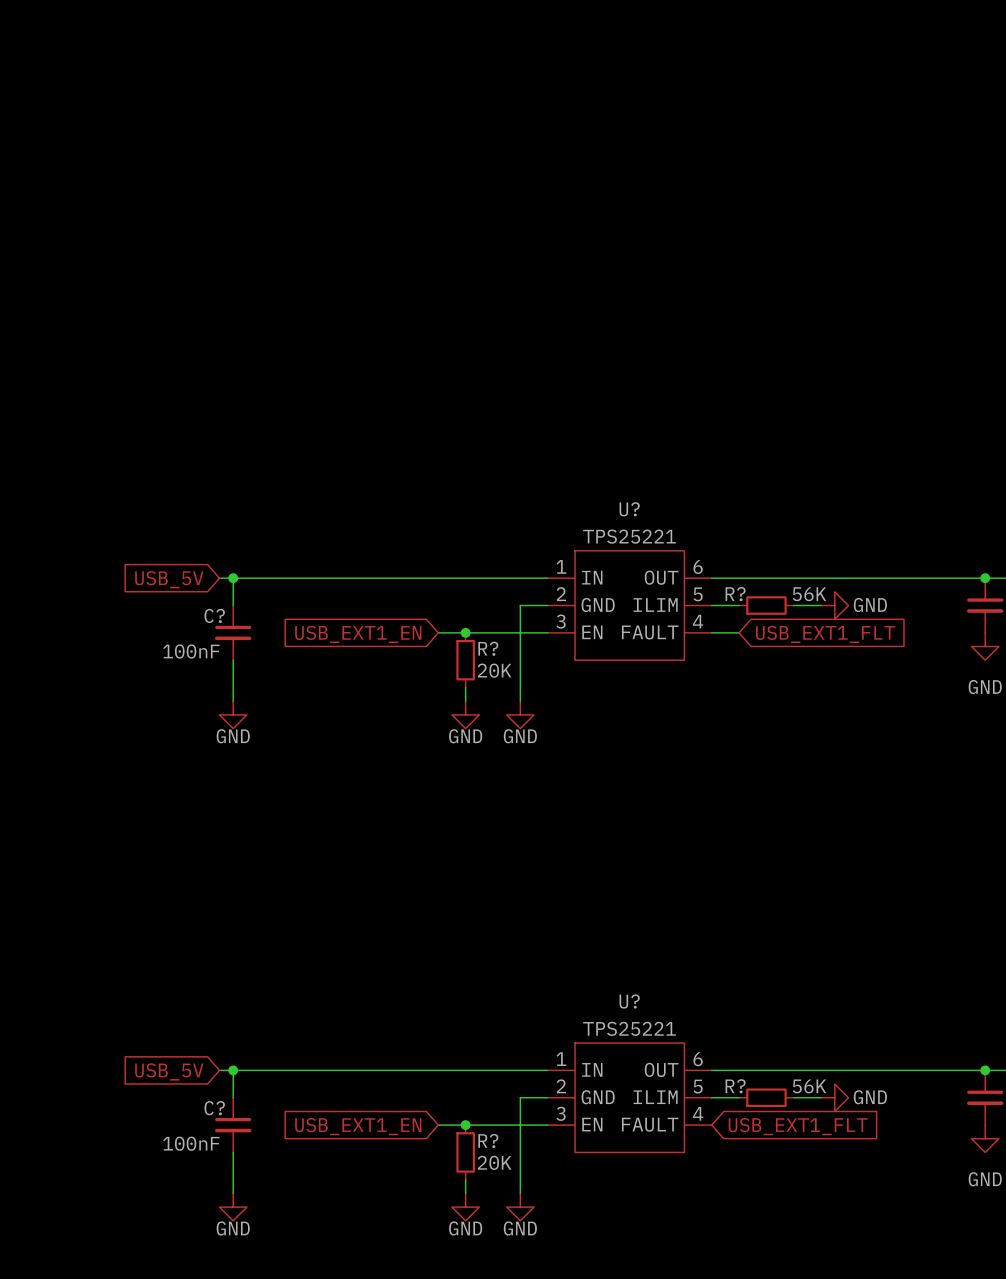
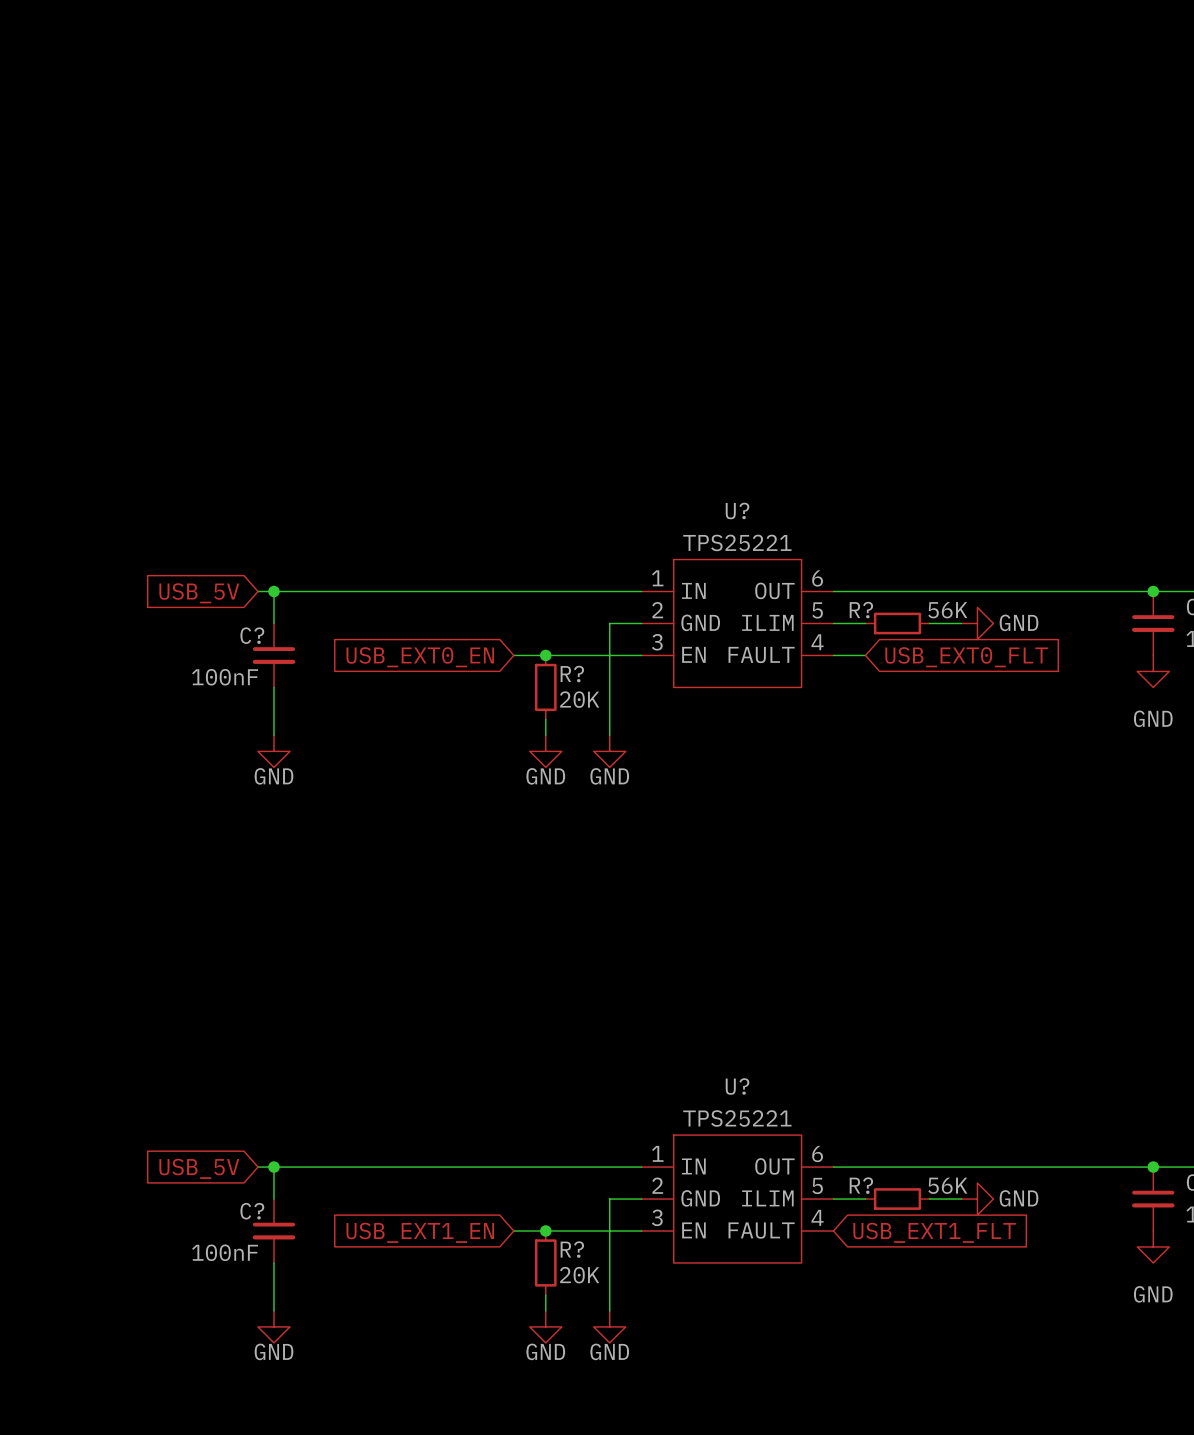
global label: USB_EXT1_EN (358, 634) -> USB_EXT0_EN (420, 657)
global label: USB_EXT1_FLT (825, 634) -> USB_EXT0_FLT (966, 657)

